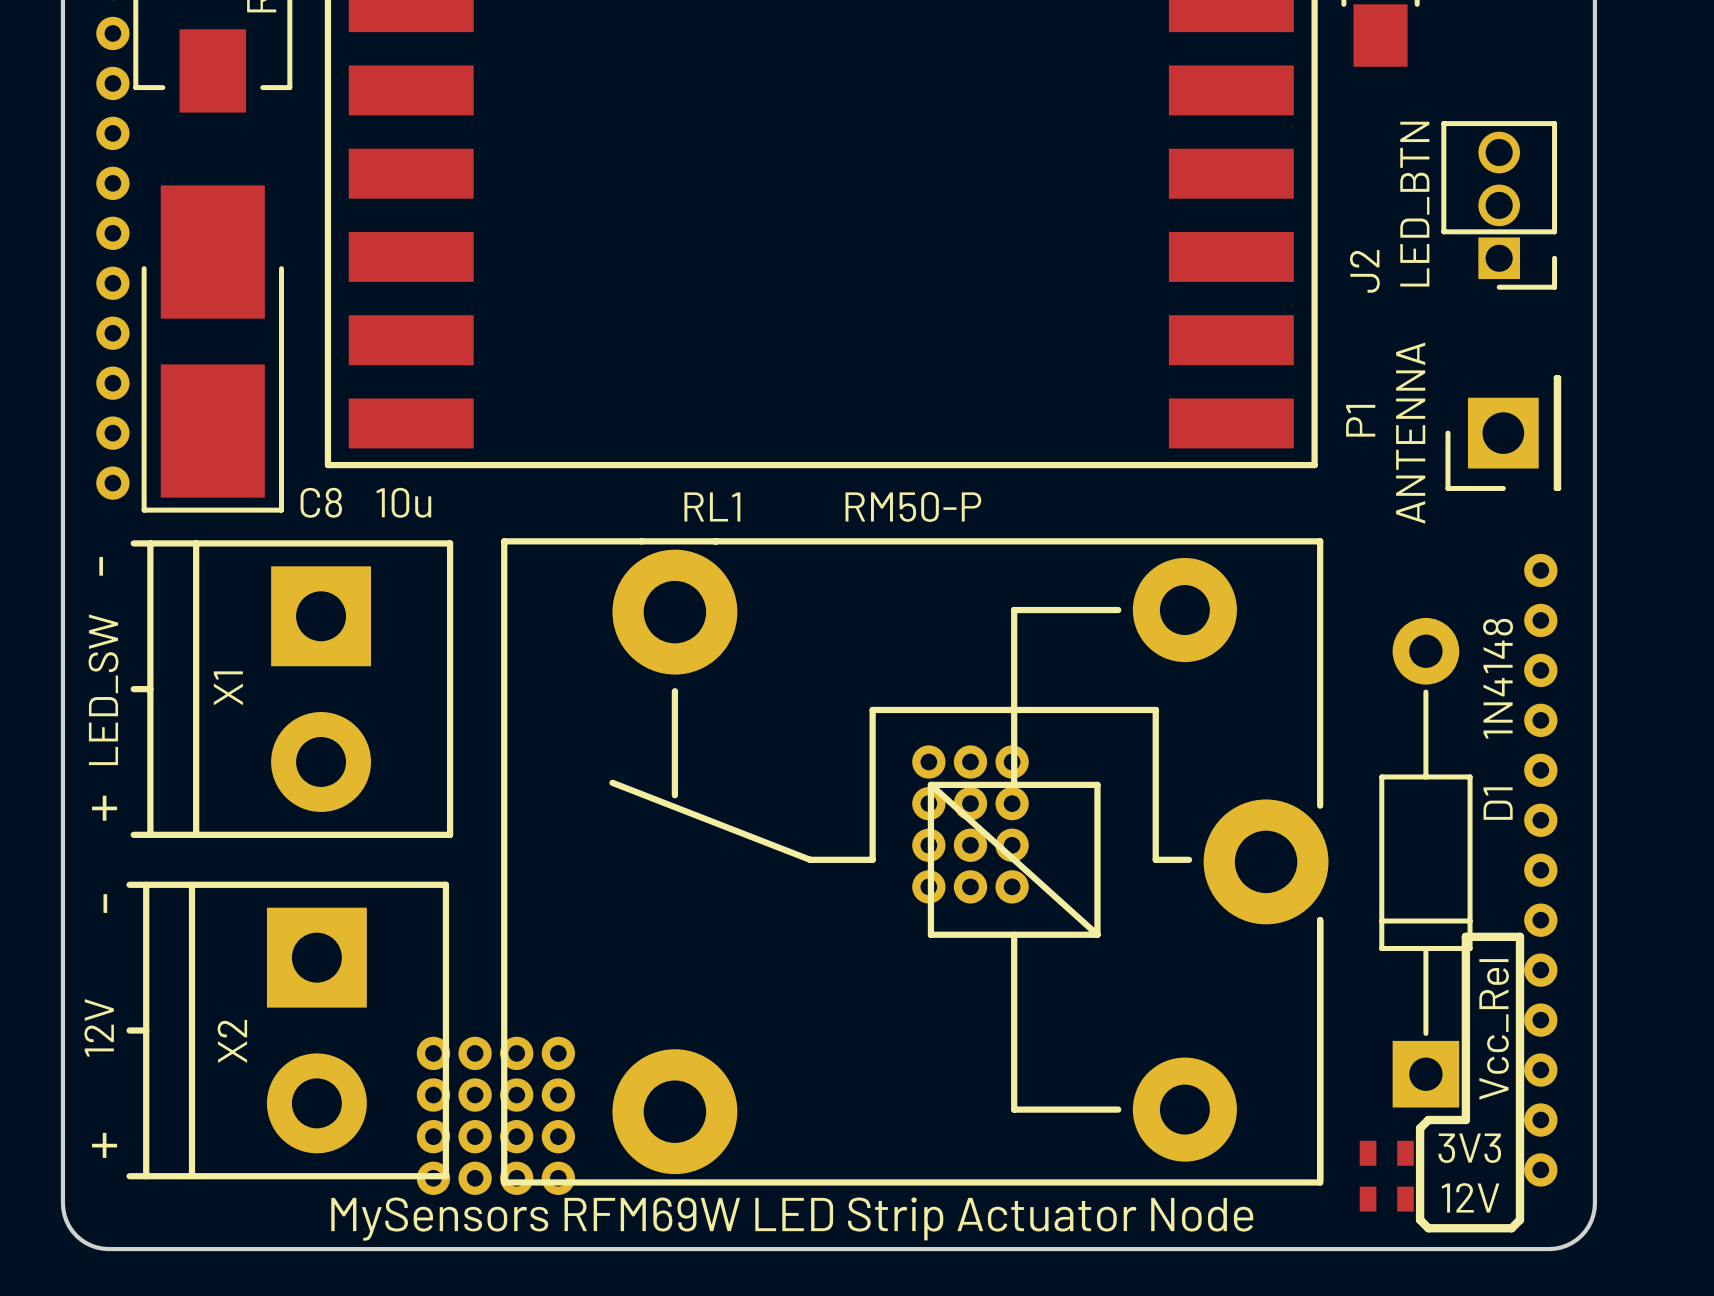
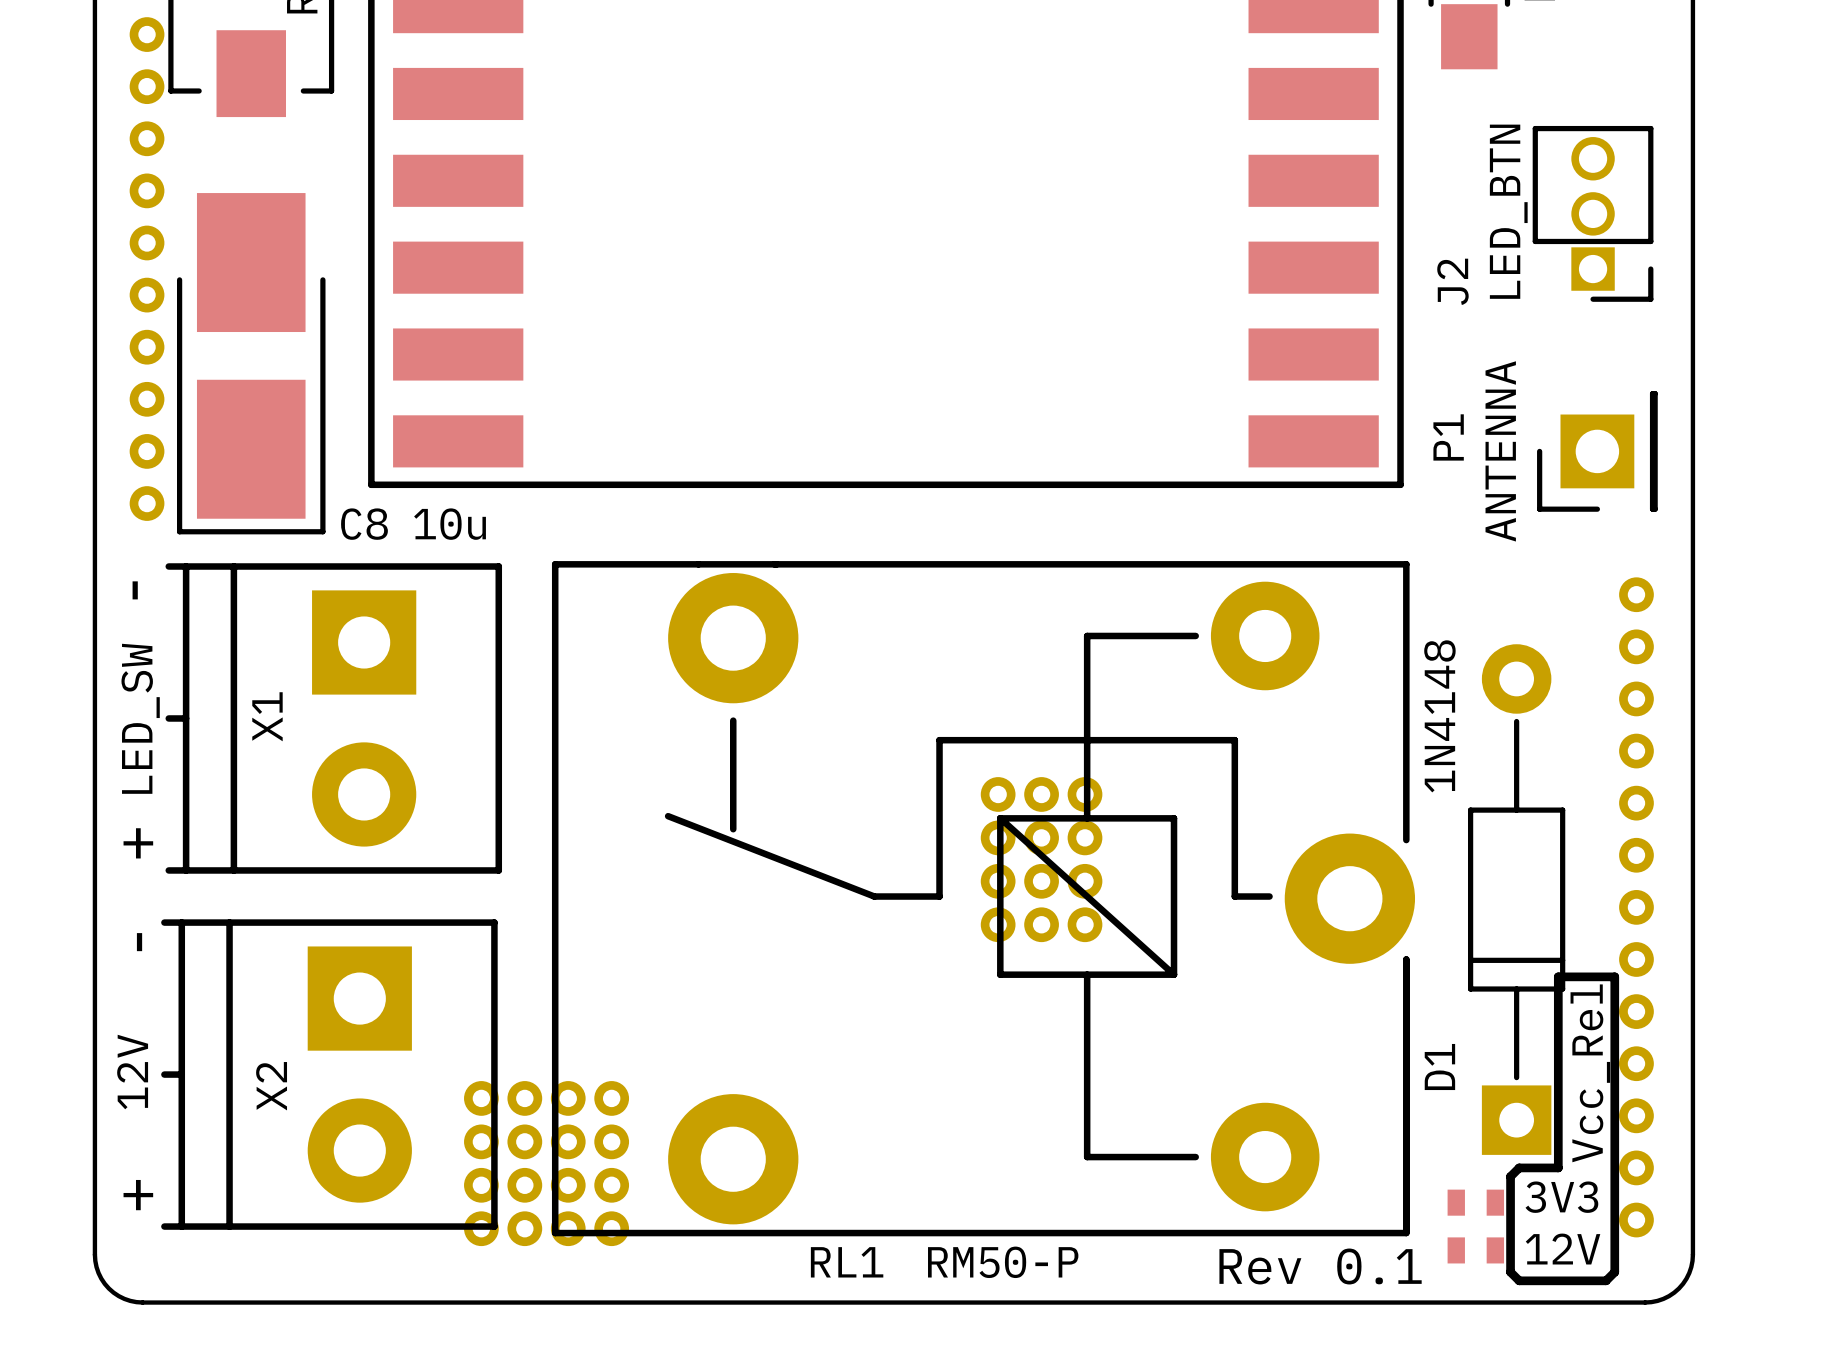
RL1 name position: RL1 (712, 506) -> RL1 (847, 1262)
RL1 value position: RM50-P (913, 506) -> RM50-P (1003, 1262)
D1 value position: 1N4148 (1498, 678) -> 1N4148 (1439, 716)
D1 name position: D1 (1498, 803) -> D1 (1439, 1067)
text: none -> Rev 0.1 (1320, 1266)
text: MySensors RFM69W LED Strip Actuator Node (792, 1219) -> none

